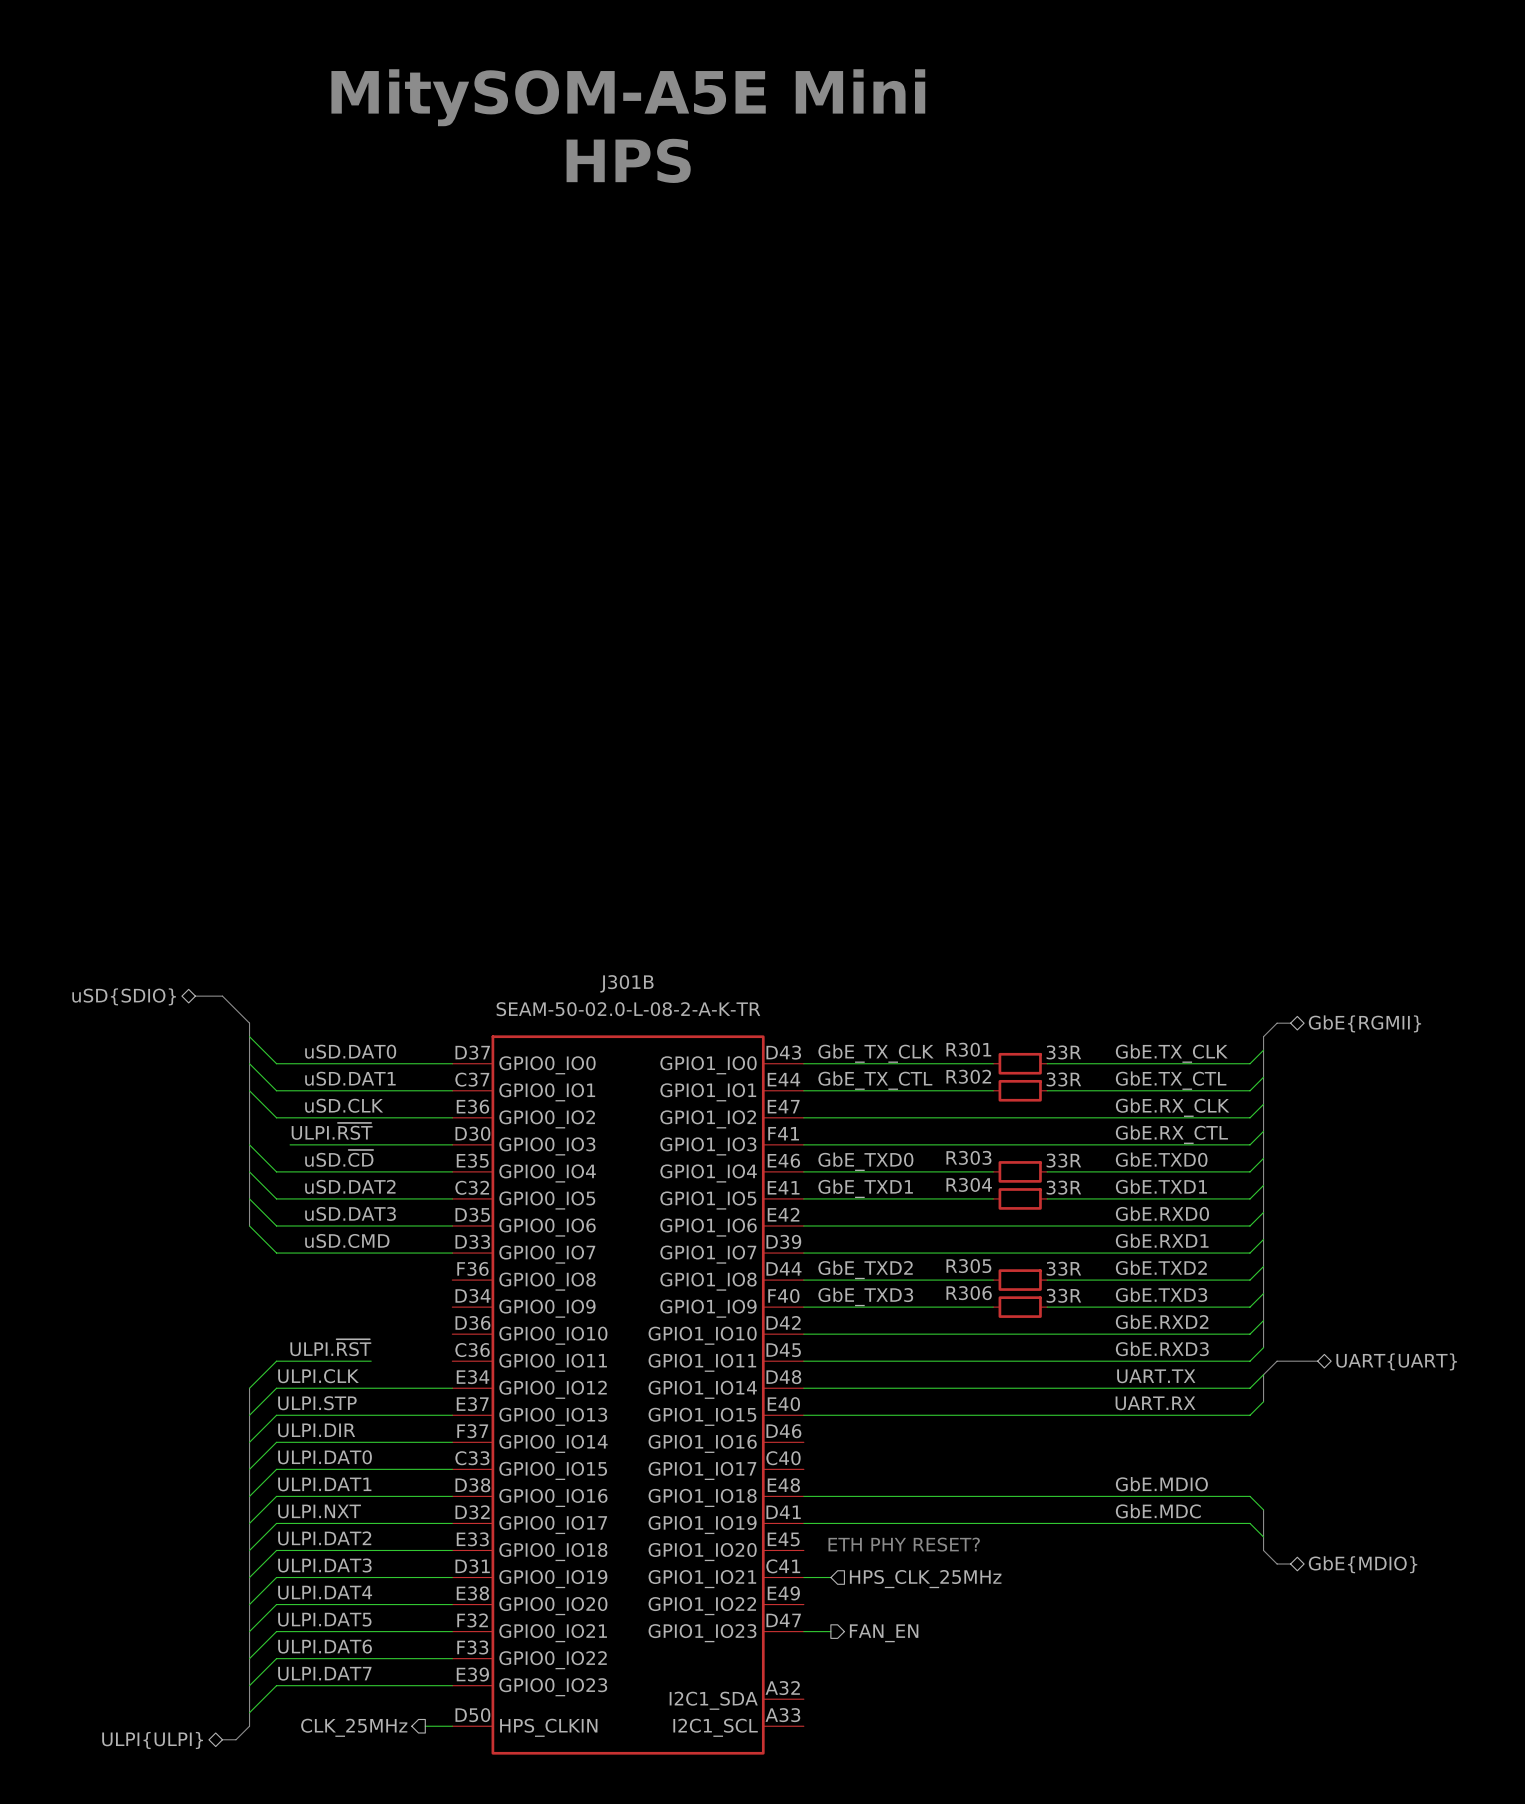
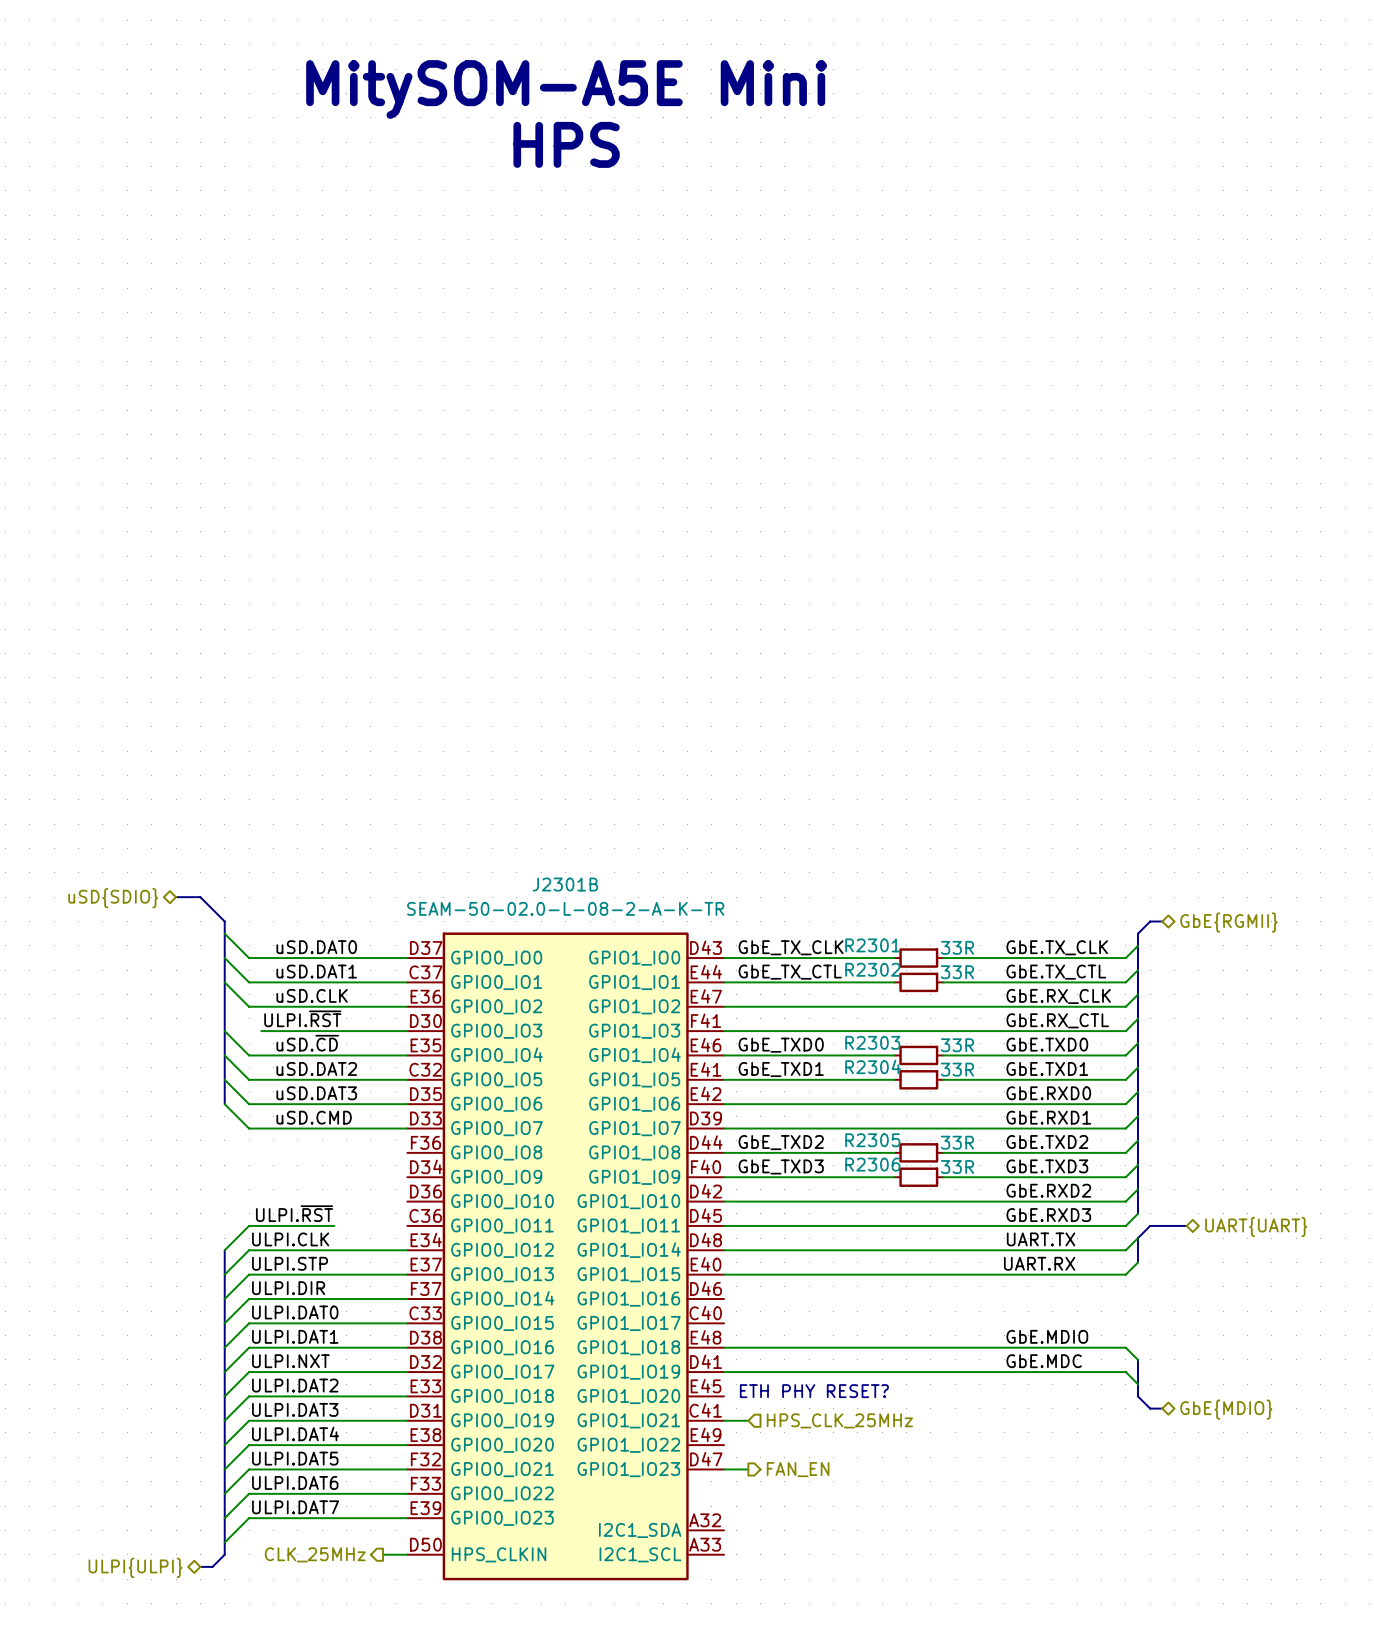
J301B name: J301B (626, 983) -> J2301B (565, 884)
R301 name: R301 (968, 1049) -> R2301 (872, 945)
R302 name: R302 (968, 1076) -> R2302 (872, 969)
R303 name: R303 (968, 1157) -> R2303 (872, 1042)
R304 name: R304 (969, 1184) -> R2304 (873, 1066)
R305 name: R305 (968, 1266) -> R2305 (872, 1140)
R306 name: R306 (969, 1293) -> R2306 (872, 1164)

